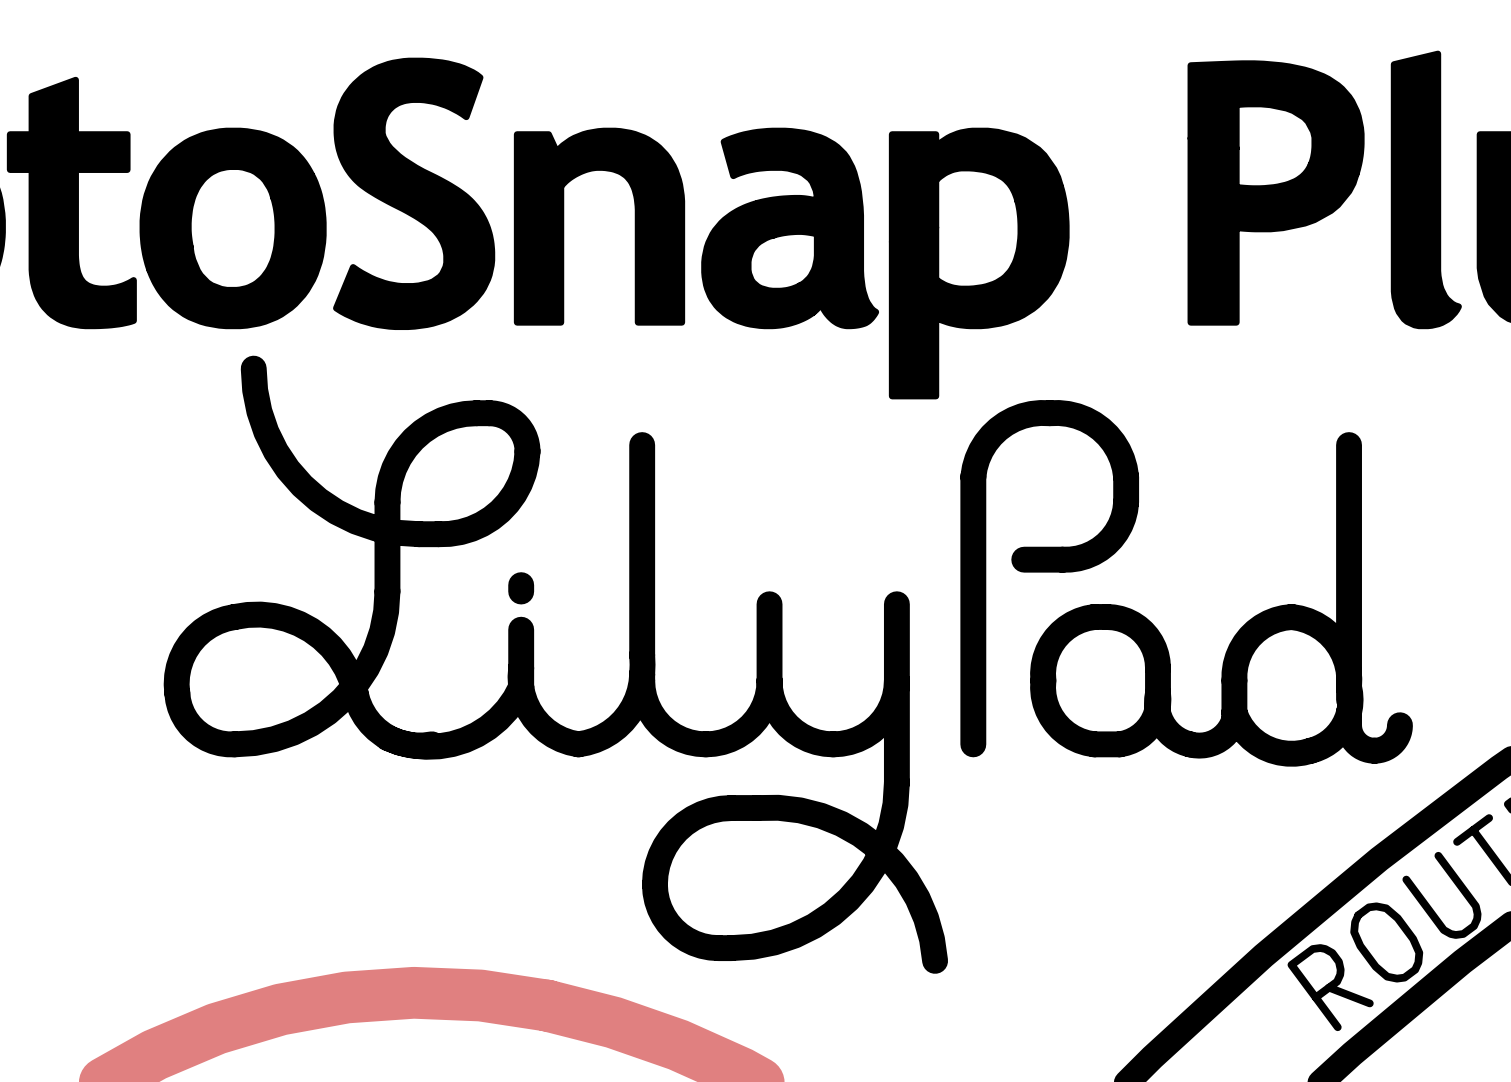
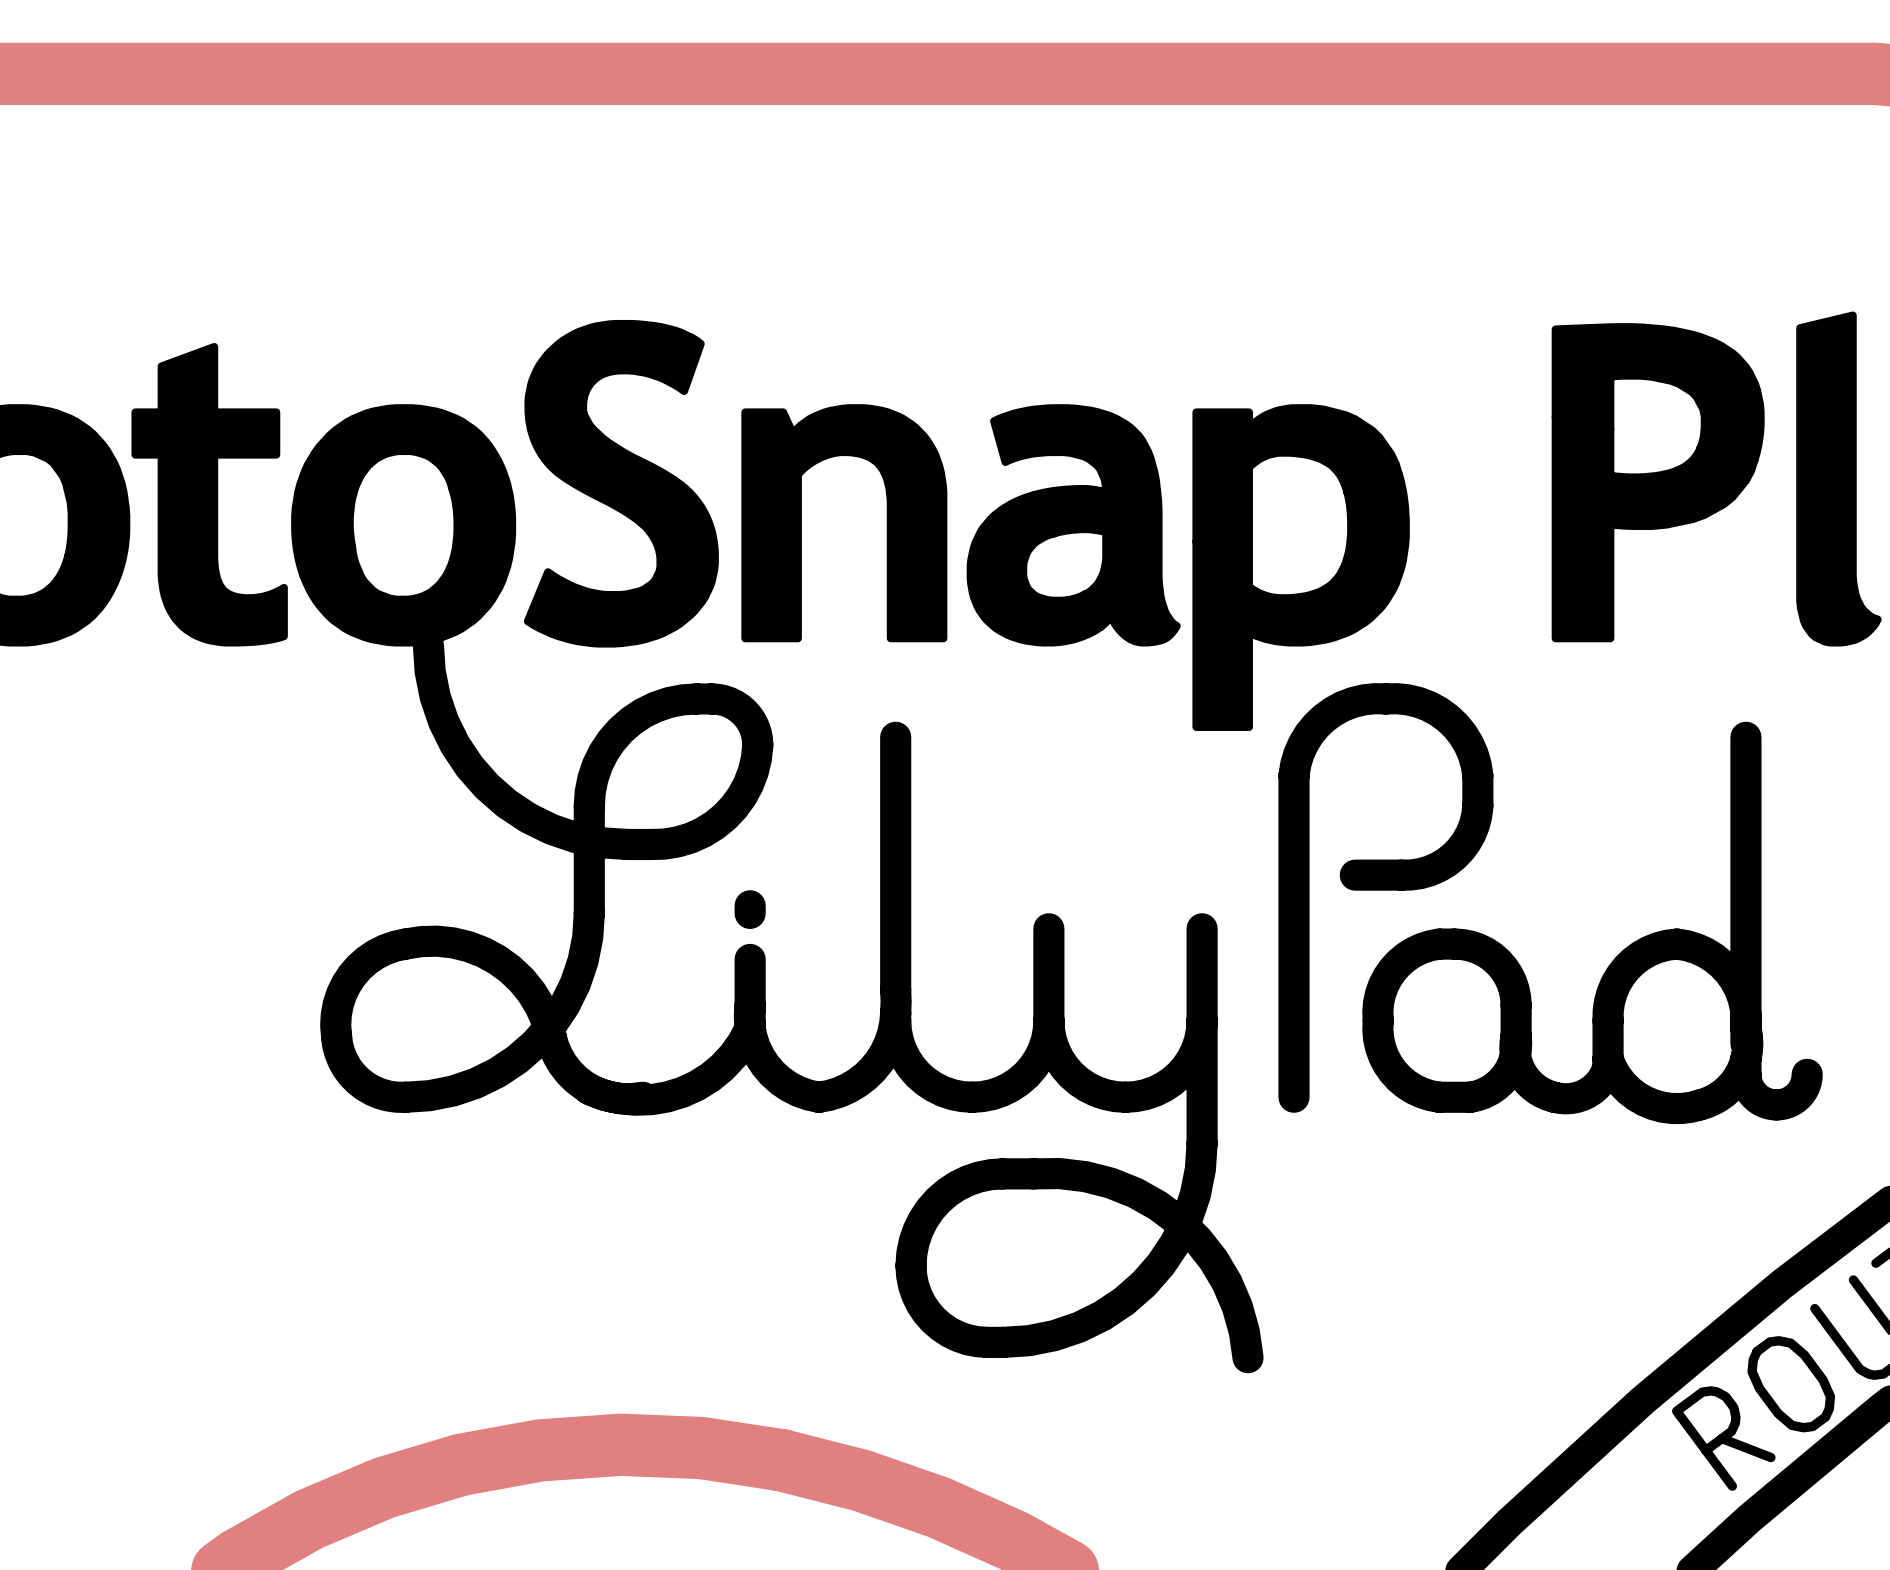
drawing position: (788, 664) -> (1071, 1001)

